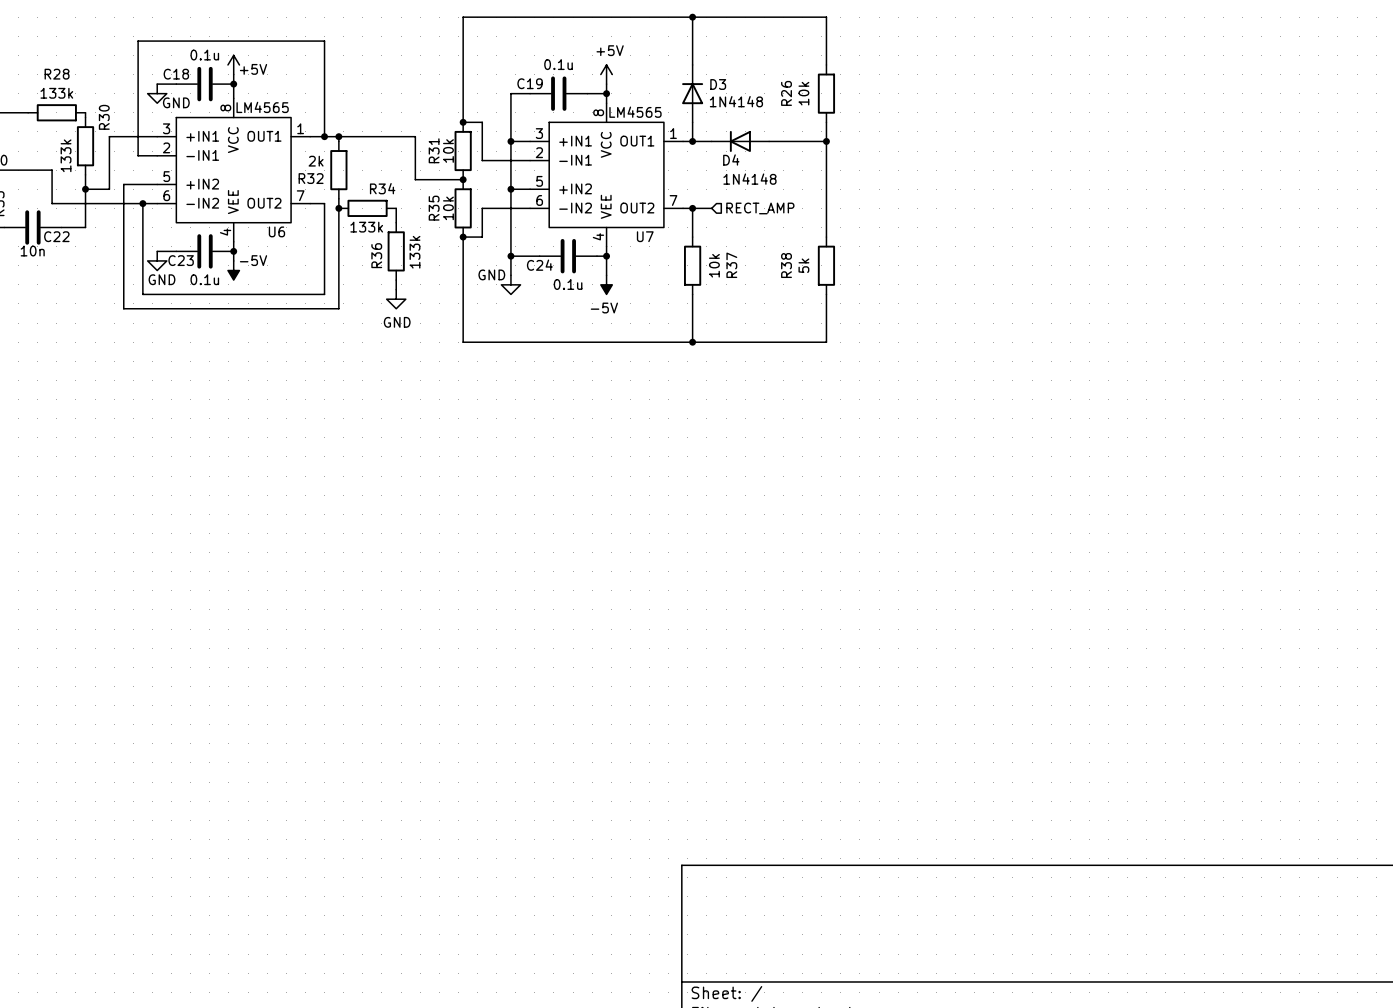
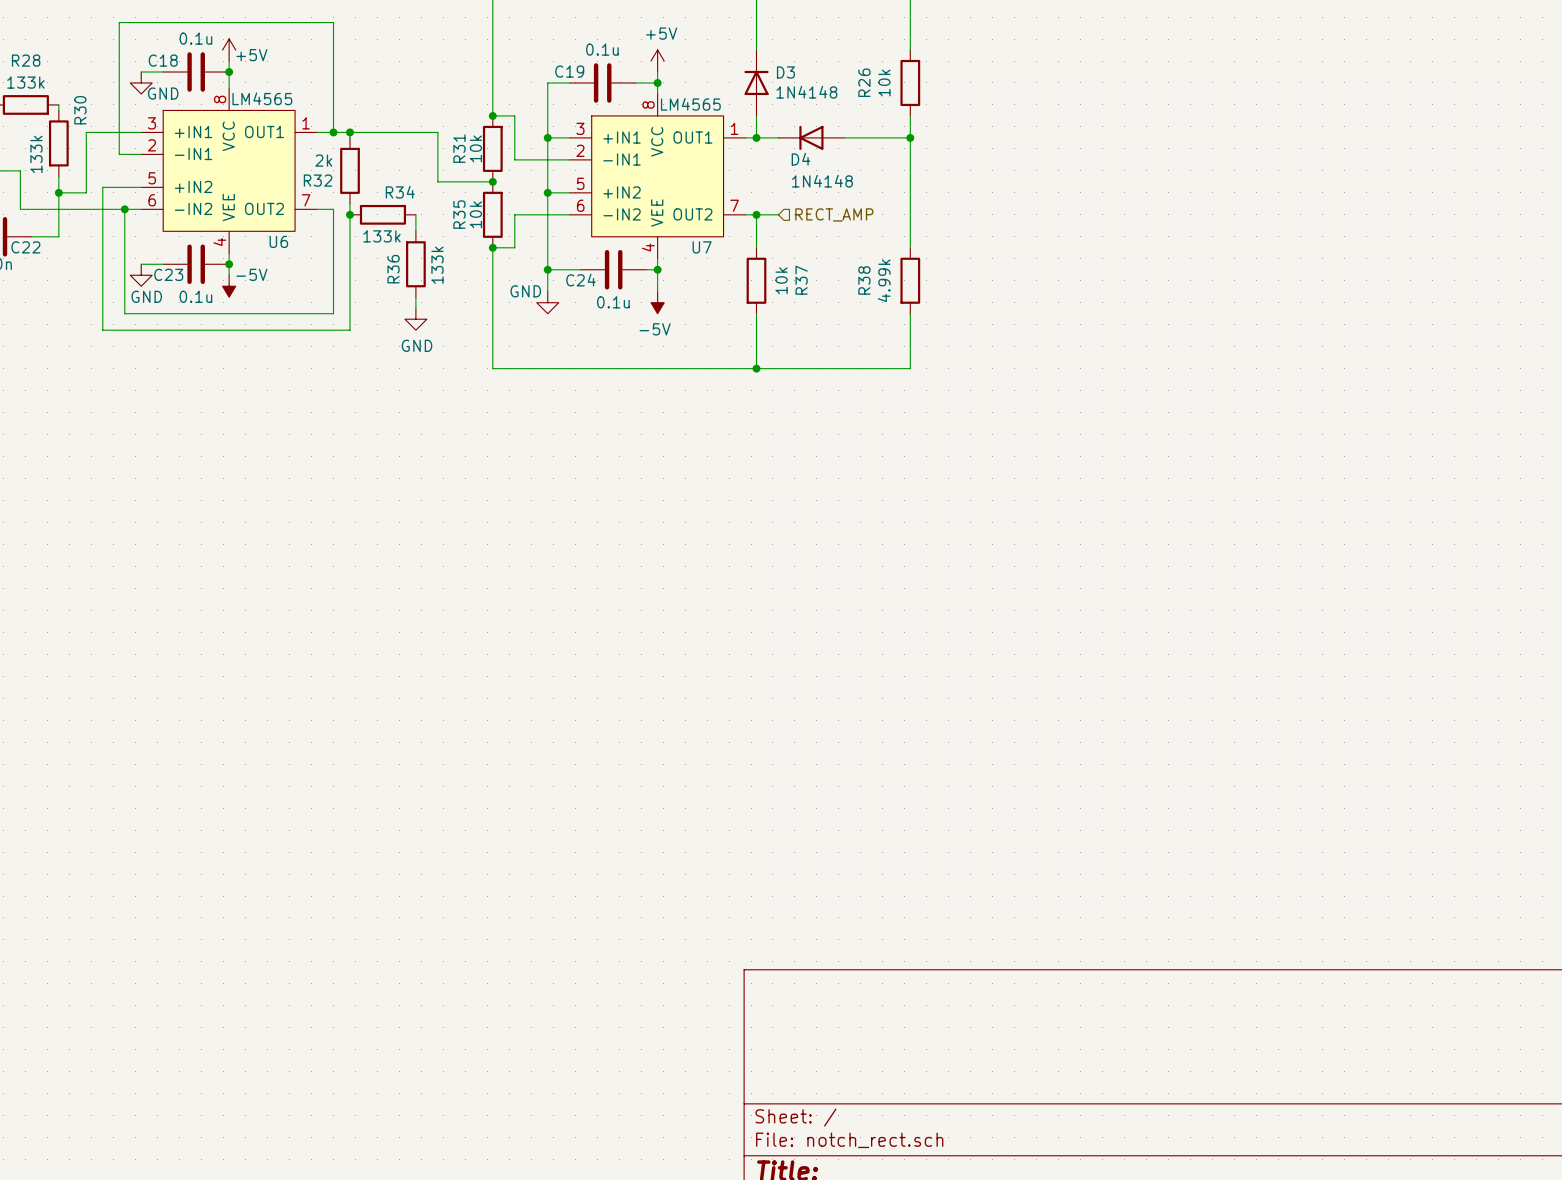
R38 value: 5k (803, 265) -> 4.99k (884, 280)

